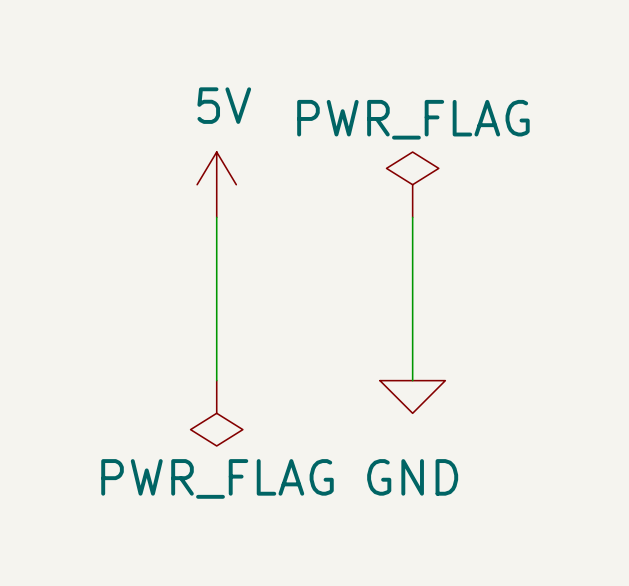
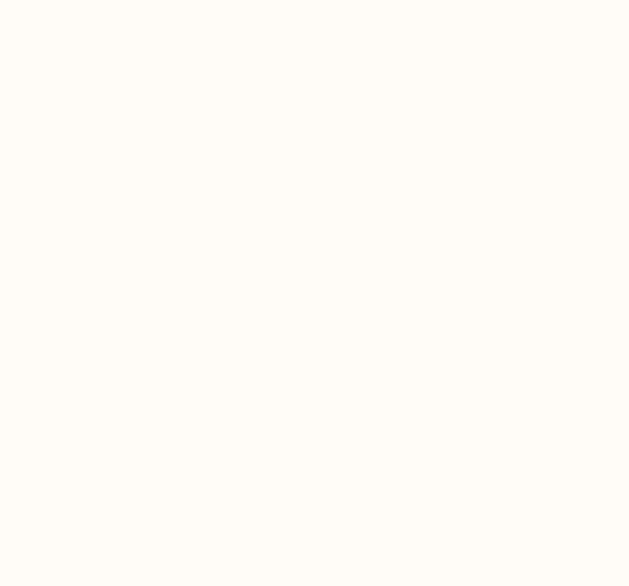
power symbol: 5V (216, 184) -> none
power symbol: PWR_FLAG (412, 184) -> none
wire: (216, 217) (216, 380) -> none
wire: (412, 217) (412, 380) -> none
power symbol: GND (412, 396) -> none
power symbol: PWR_FLAG (216, 413) -> none

